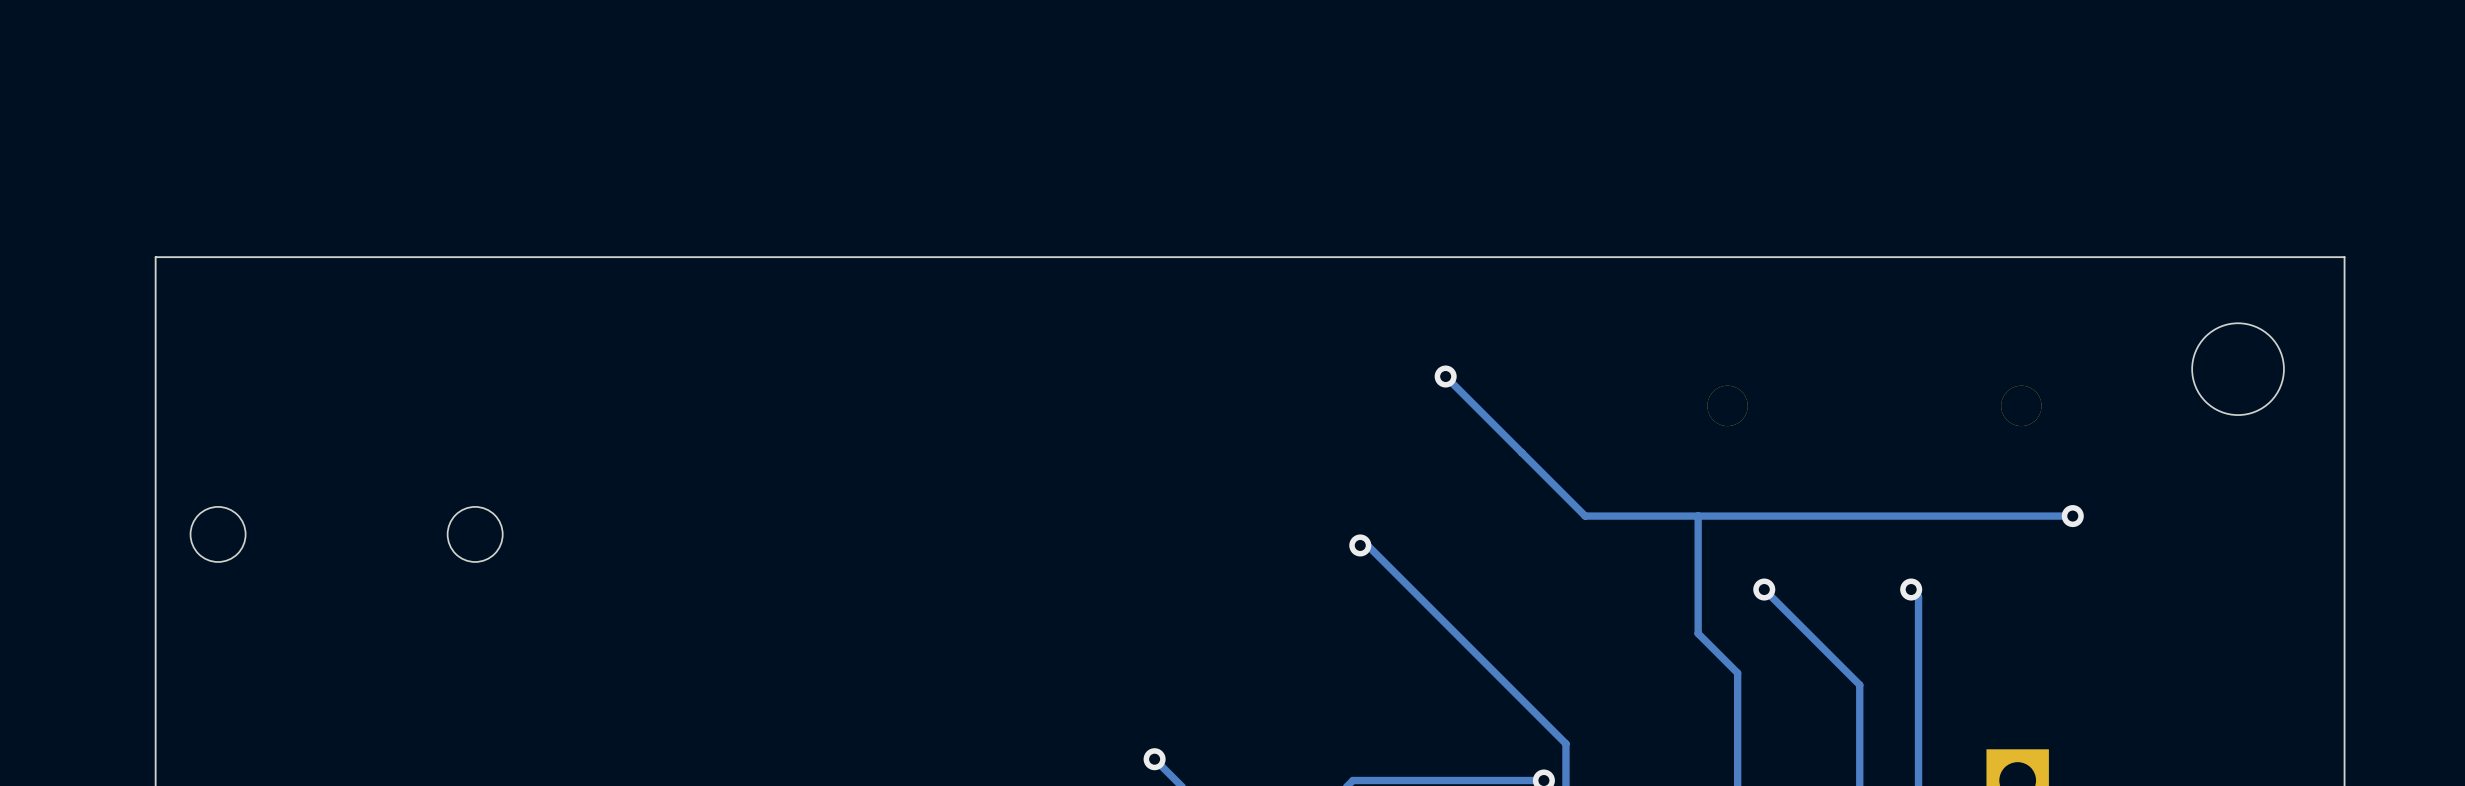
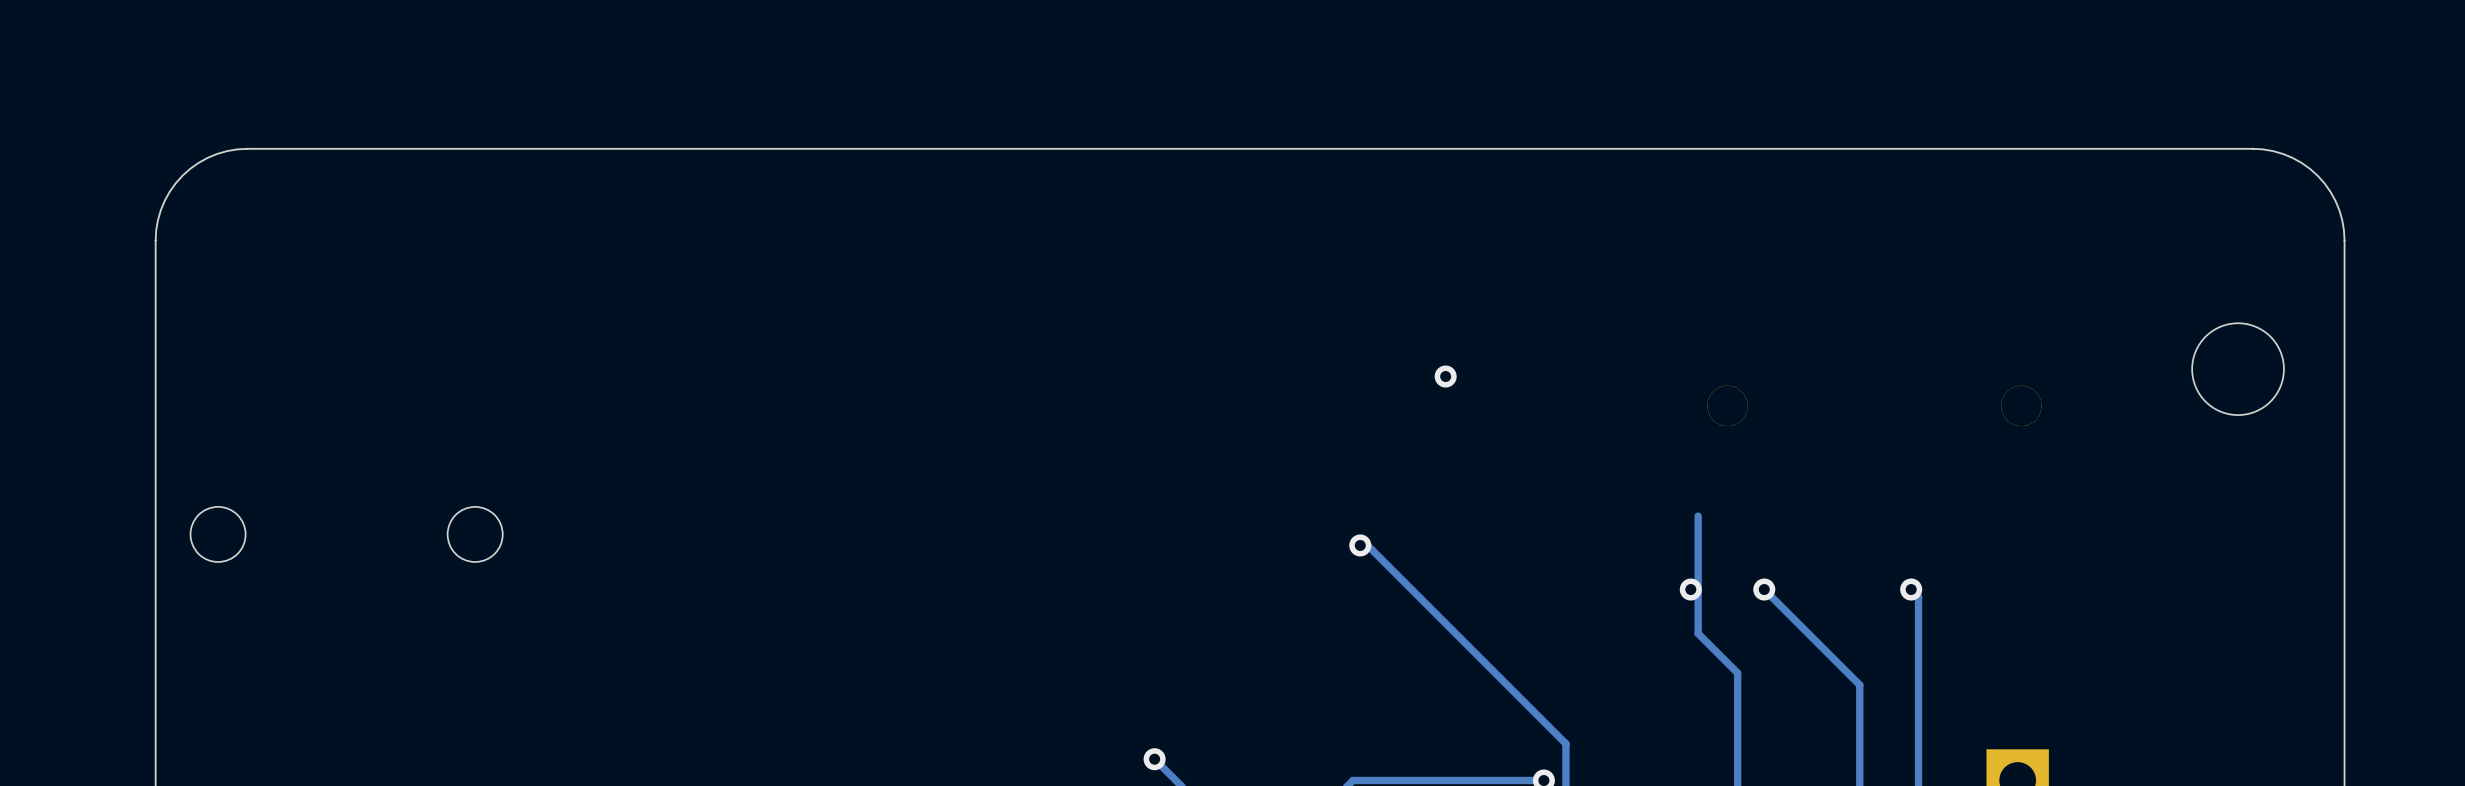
board edge: (2344, 257) (155, 257) -> (2344, 257) (2342, 220) (2335, 200) (2324, 183) (2309, 168) (2292, 157) (2273, 151) (2252, 148) (247, 148) (227, 151) (207, 157) (190, 168) (175, 183) (164, 200) (157, 220) (155, 257)
track: (1445, 376) (1585, 516) (2072, 516) -> none
via: (2072, 516) -> none
via: none -> (1690, 589)

